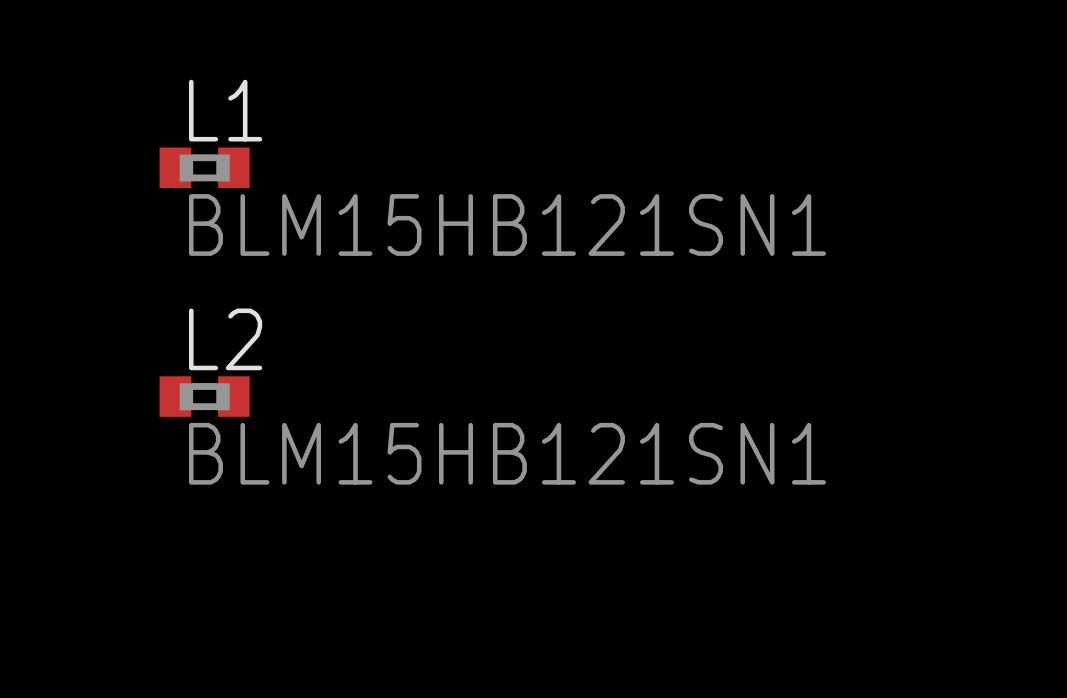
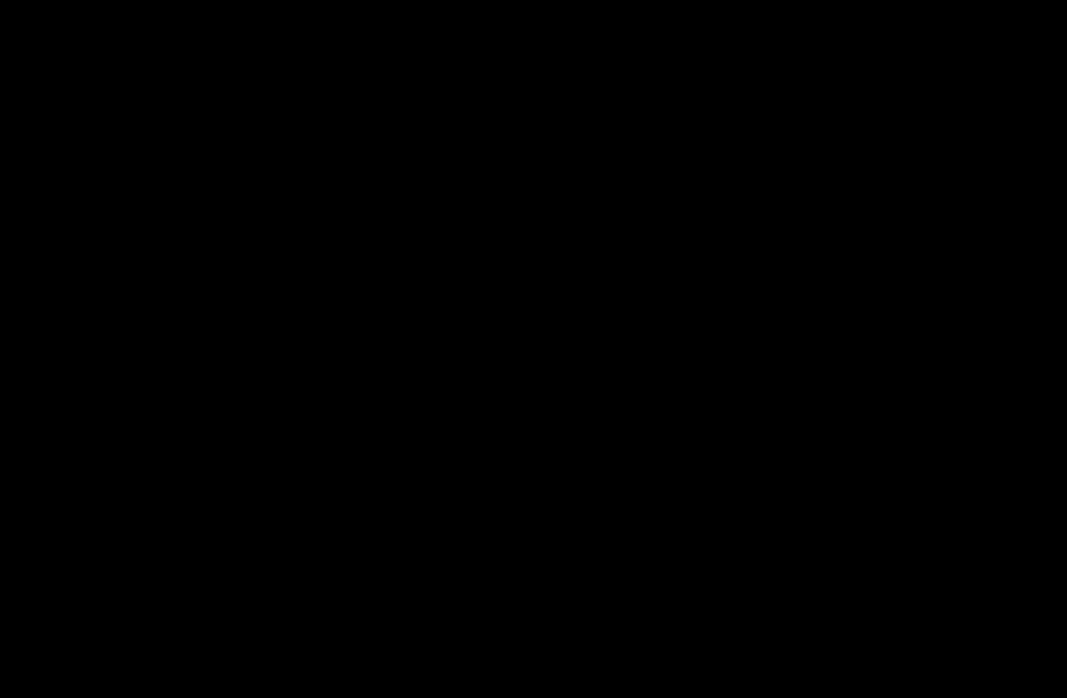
L1: BLM15HB121SN1 (204, 167) -> none
L2: BLM15HB121SN1 (204, 396) -> none

